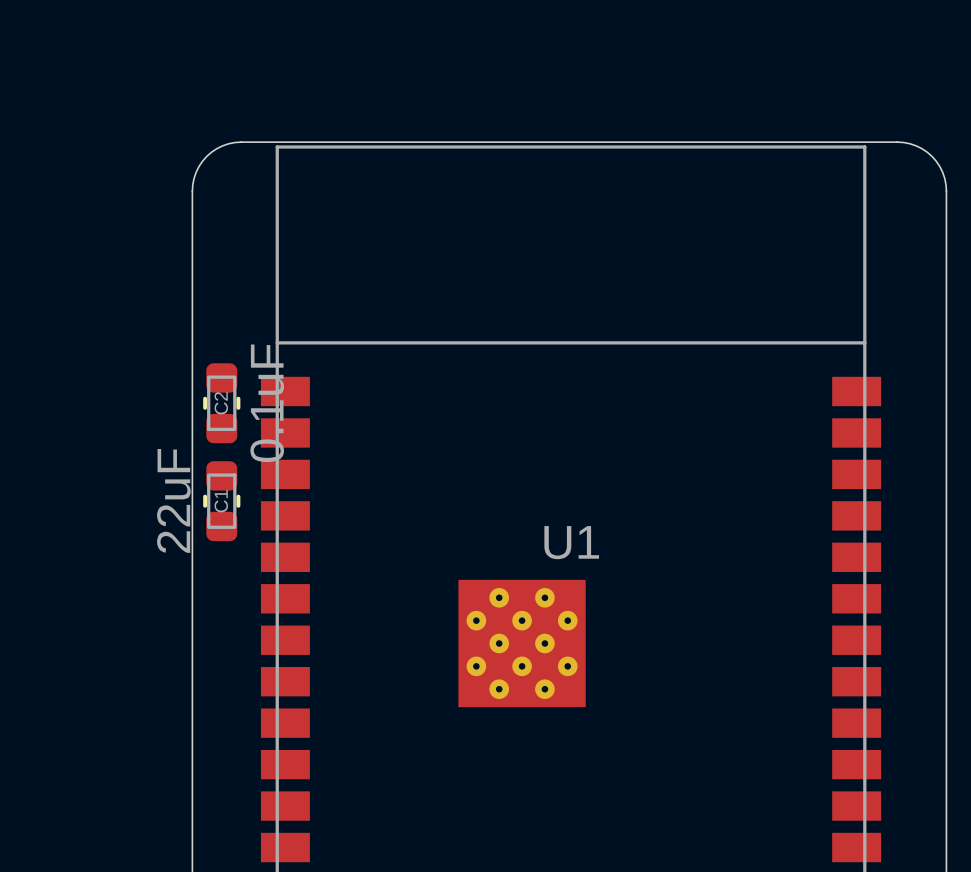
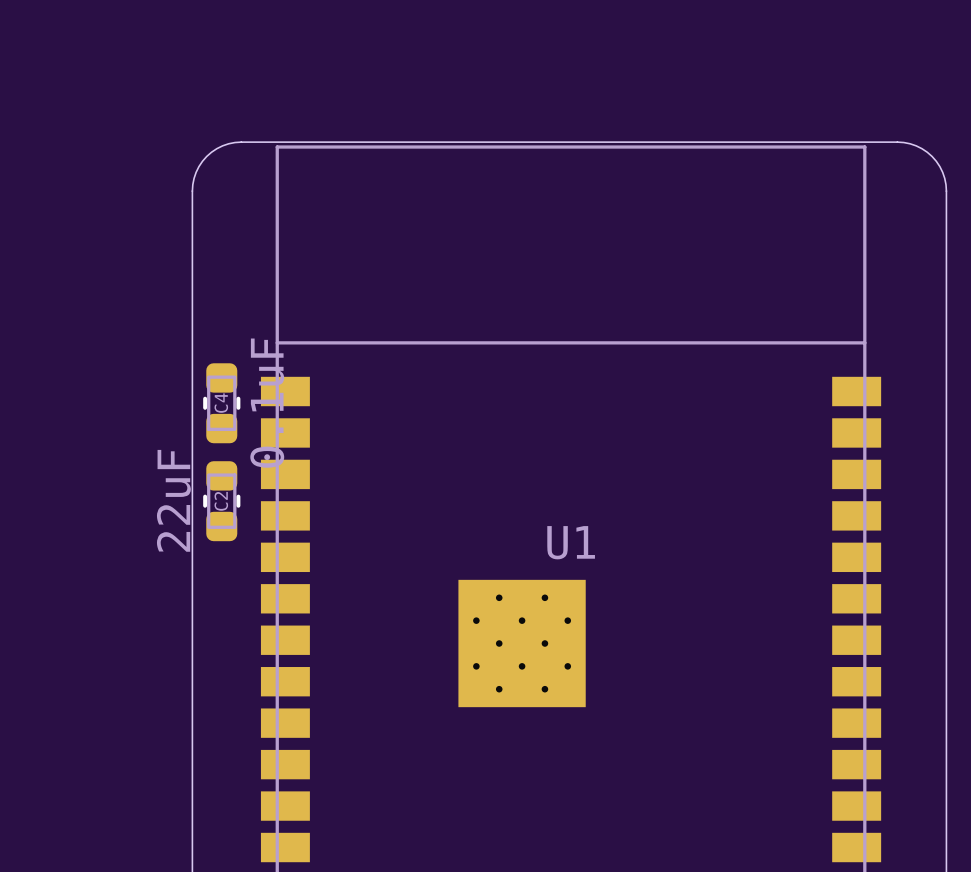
C2 name: C2 (221, 403) -> C4 (221, 403)
C1 name: C1 (221, 501) -> C2 (221, 501)

